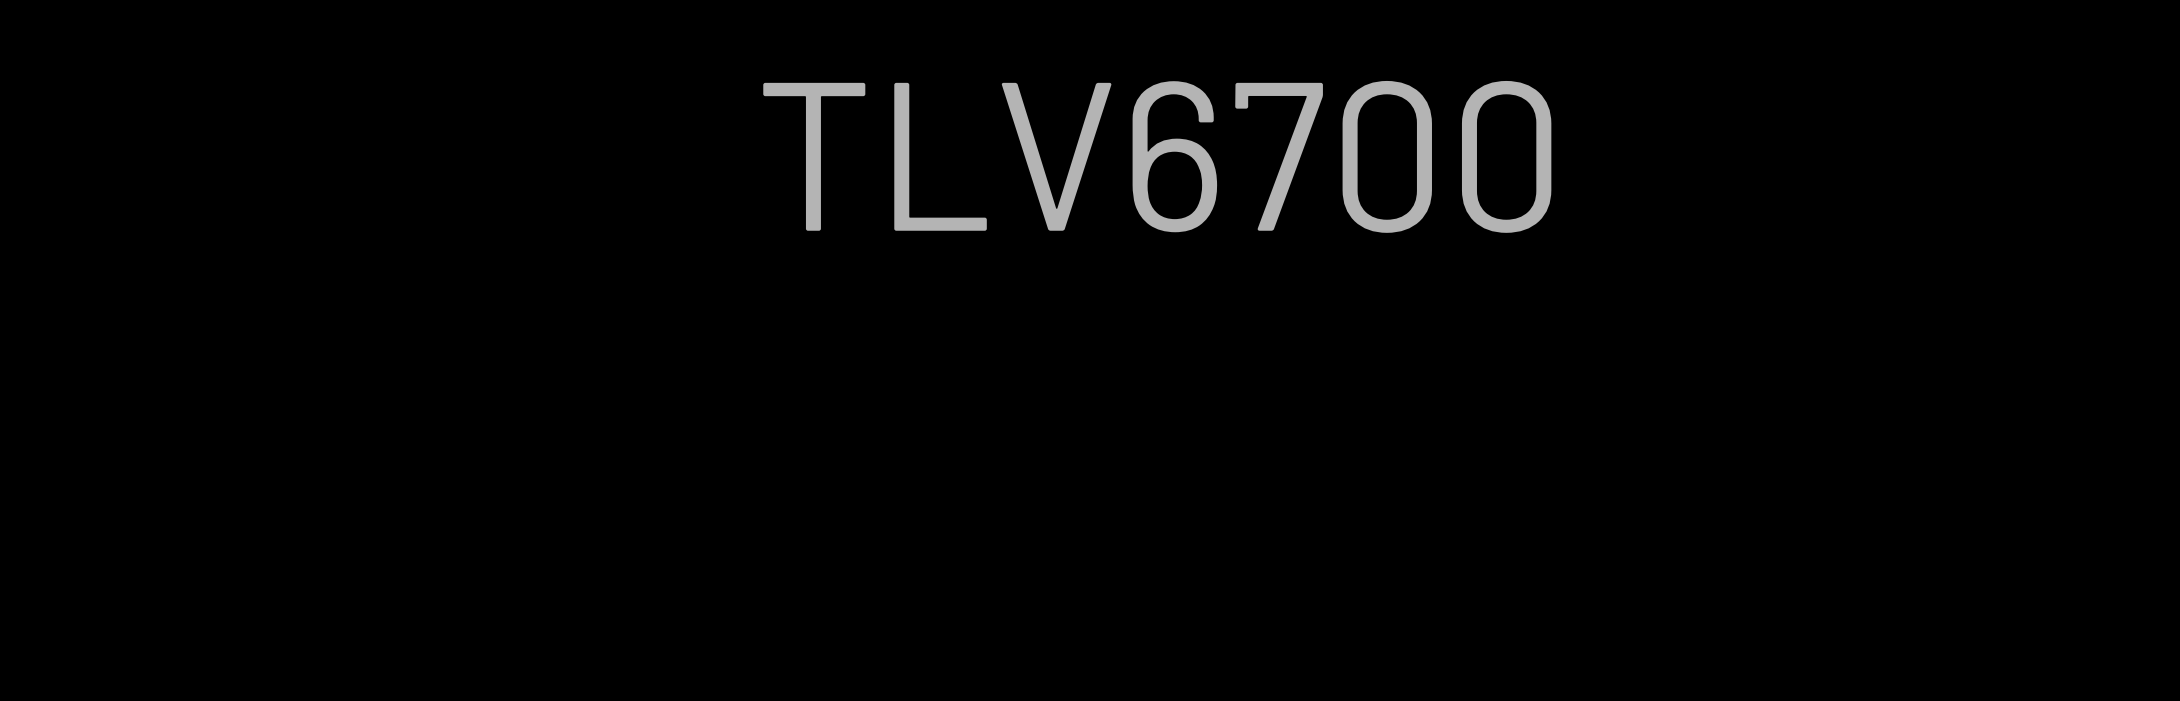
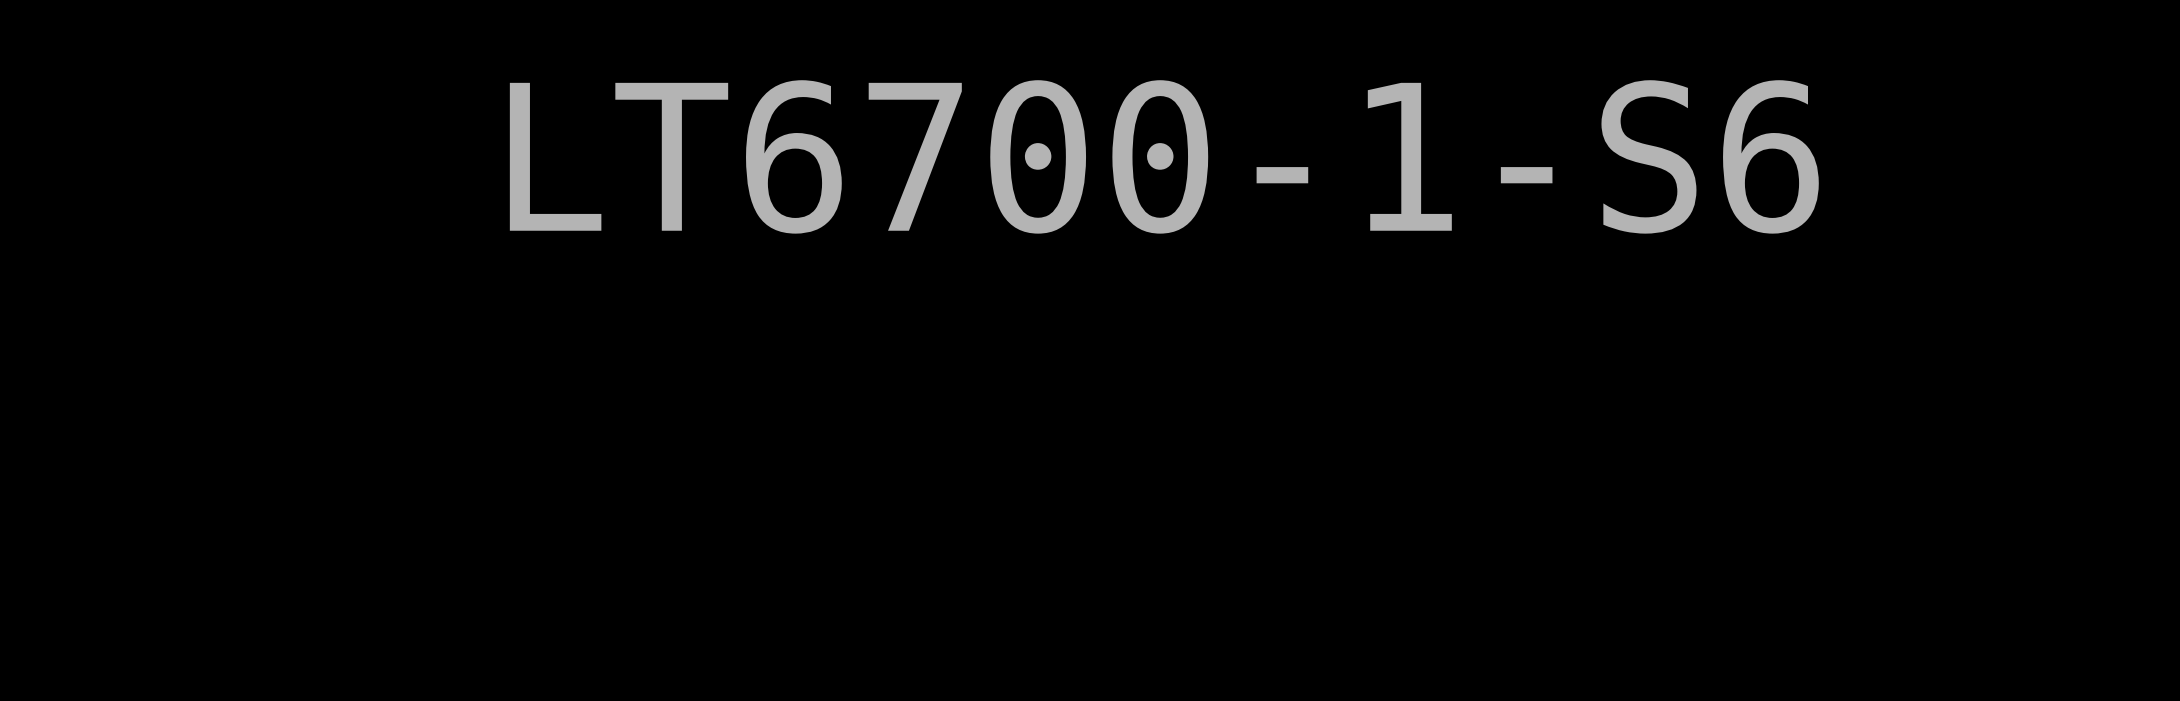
part value: TLV6700 (1157, 156) -> LT6700-1-S6 (1164, 156)

